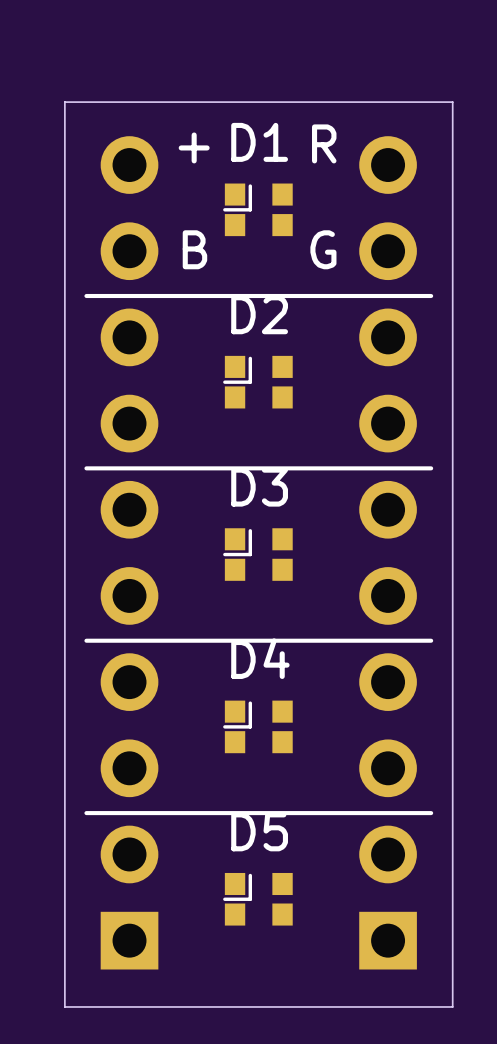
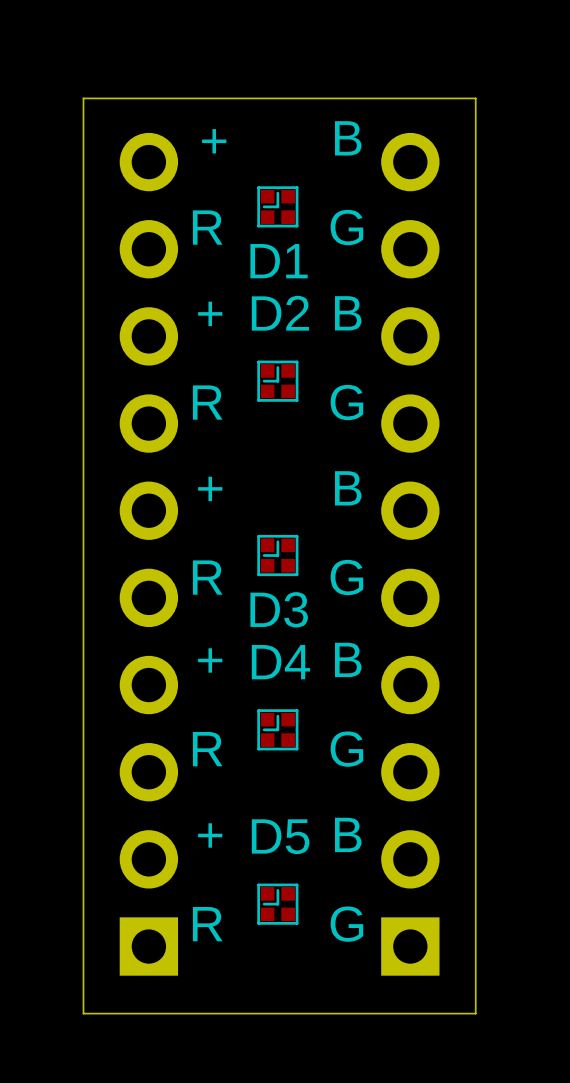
D1 name position: D1 (259, 142) -> D1 (279, 261)
text: R (324, 143) -> B (348, 138)
D1 footprint: [223, 183, 293, 237] -> [257, 186, 299, 228]
text: B (194, 249) -> R (207, 227)
text position: G (323, 249) -> G (346, 227)
line: (86, 296) (431, 296) -> none
text: none -> B (348, 313)
text: none -> + (210, 313)
D2 footprint: [223, 355, 293, 409] -> [257, 360, 299, 402]
text: none -> R (207, 402)
text: none -> G (346, 402)
line: (86, 468) (431, 468) -> none
D3 name position: D3 (259, 487) -> D3 (279, 609)
text: none -> B (348, 488)
text: none -> + (210, 488)
D3 footprint: [223, 528, 293, 581] -> [257, 534, 299, 577]
text: none -> R (207, 577)
text: none -> G (346, 577)
line: (86, 640) (431, 640) -> none
text: none -> B (348, 659)
text: none -> + (210, 660)
D4 footprint: [223, 700, 293, 754] -> [257, 709, 299, 751]
text: none -> R (207, 749)
text: none -> G (346, 749)
line: (86, 813) (431, 813) -> none
text: none -> B (348, 834)
text: none -> + (210, 835)
D5 footprint: [223, 872, 293, 926] -> [257, 883, 299, 925]
text: none -> R (207, 924)
text: none -> G (346, 924)

